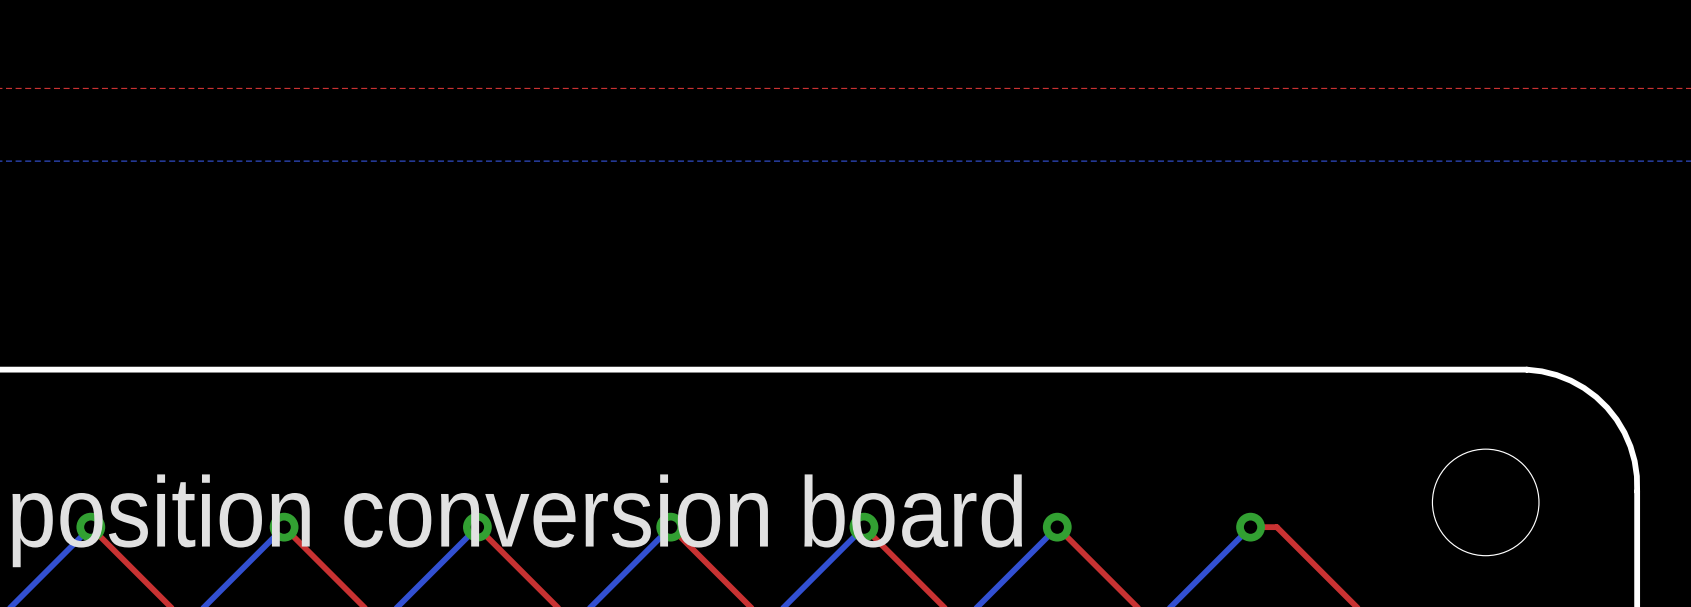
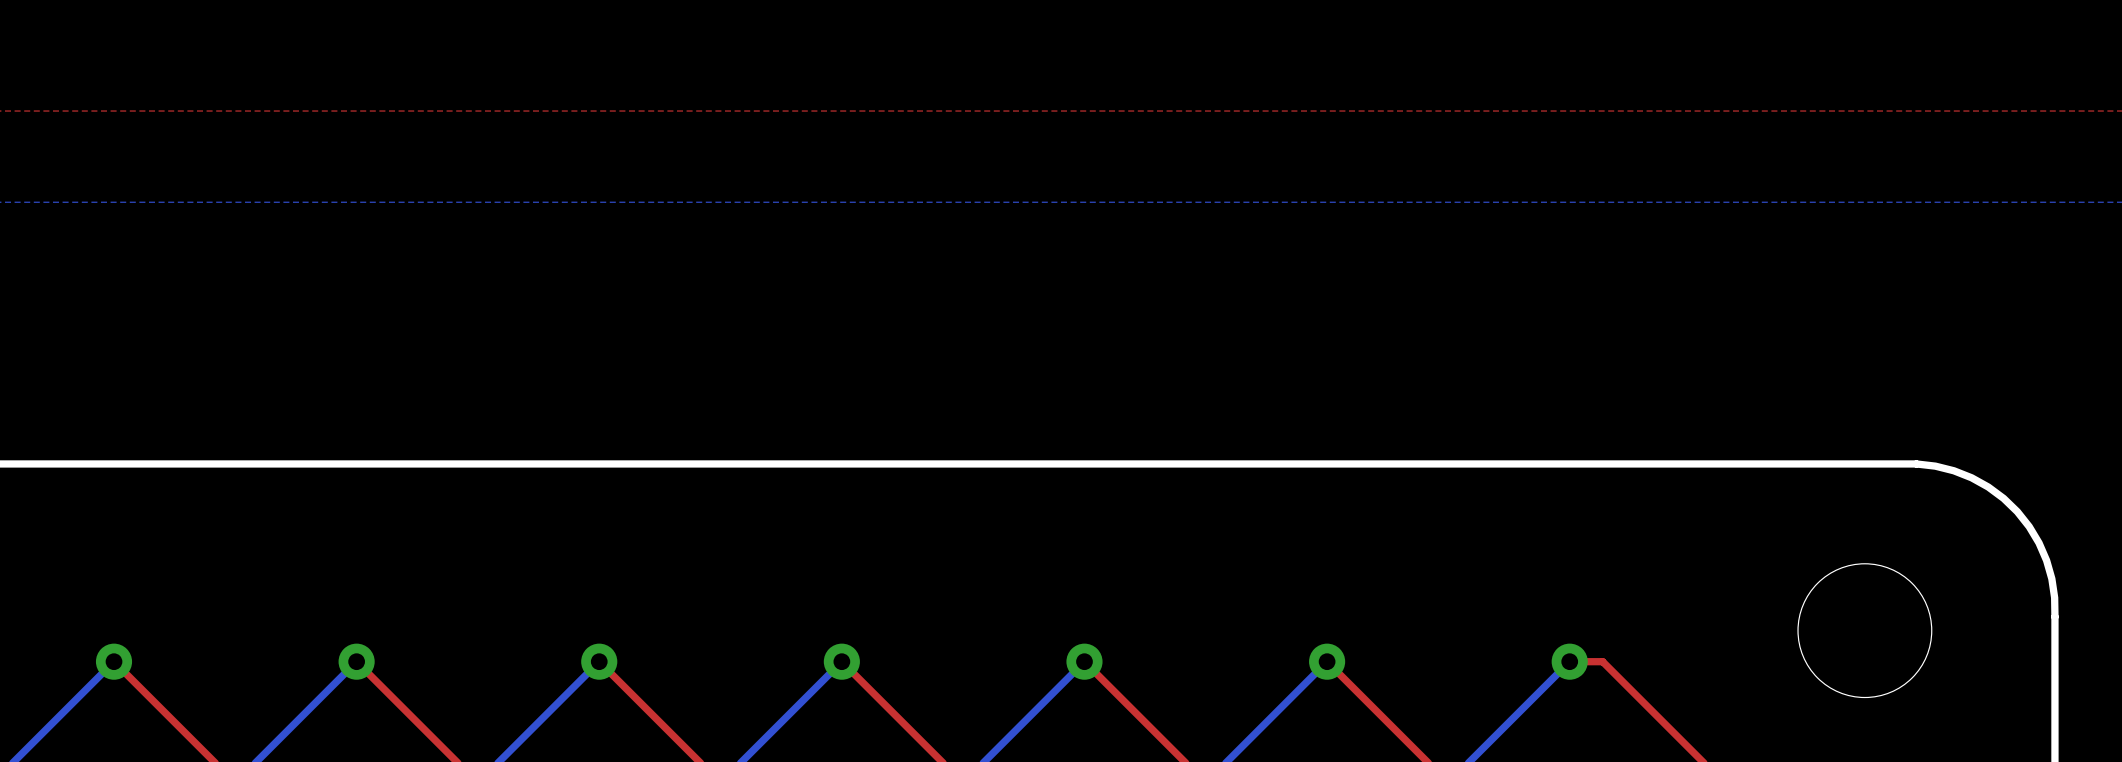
text: position conversion board (517, 520) -> none

